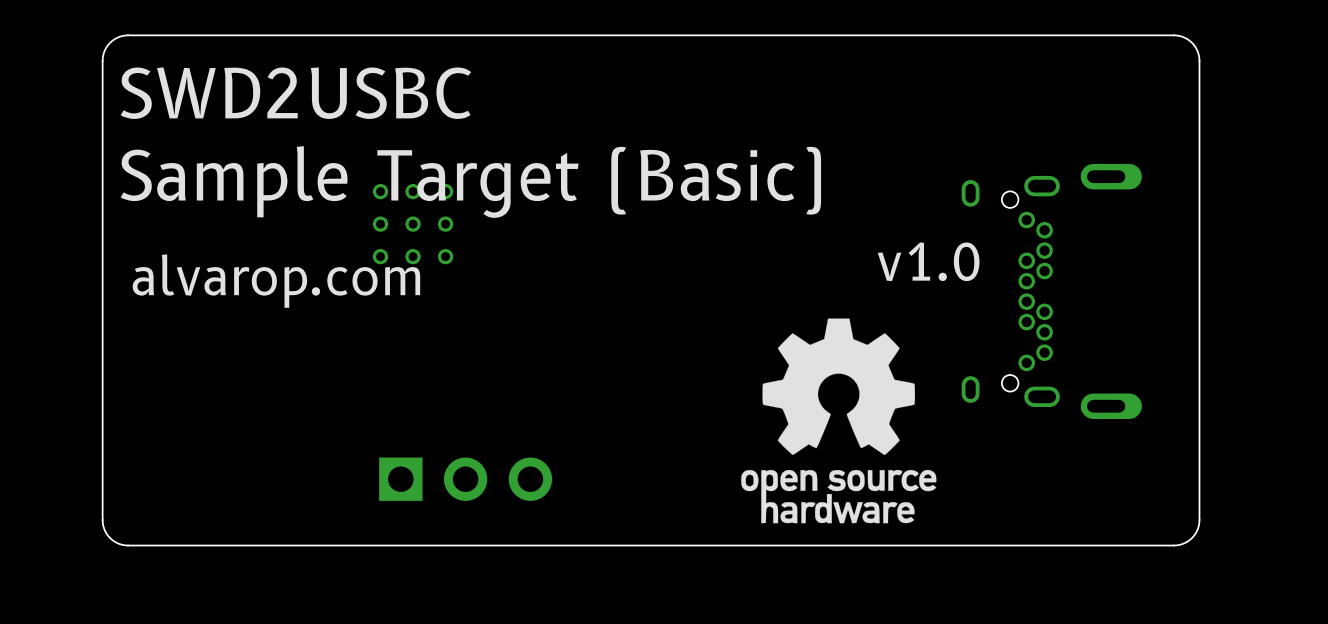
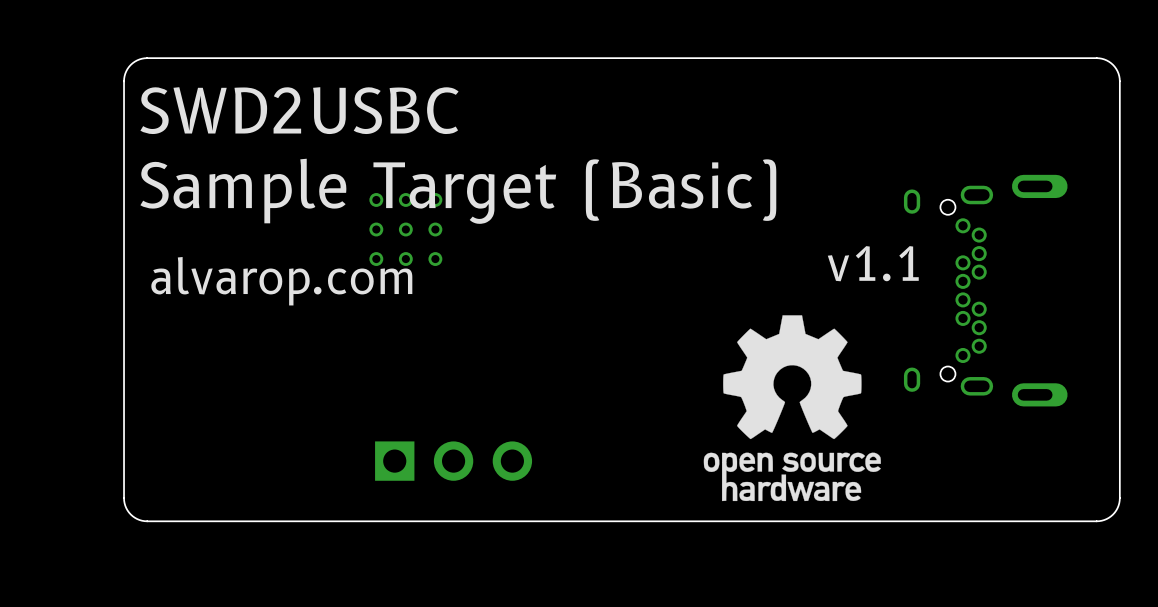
text: v1.0 (928, 261) -> v1.1 (873, 263)

